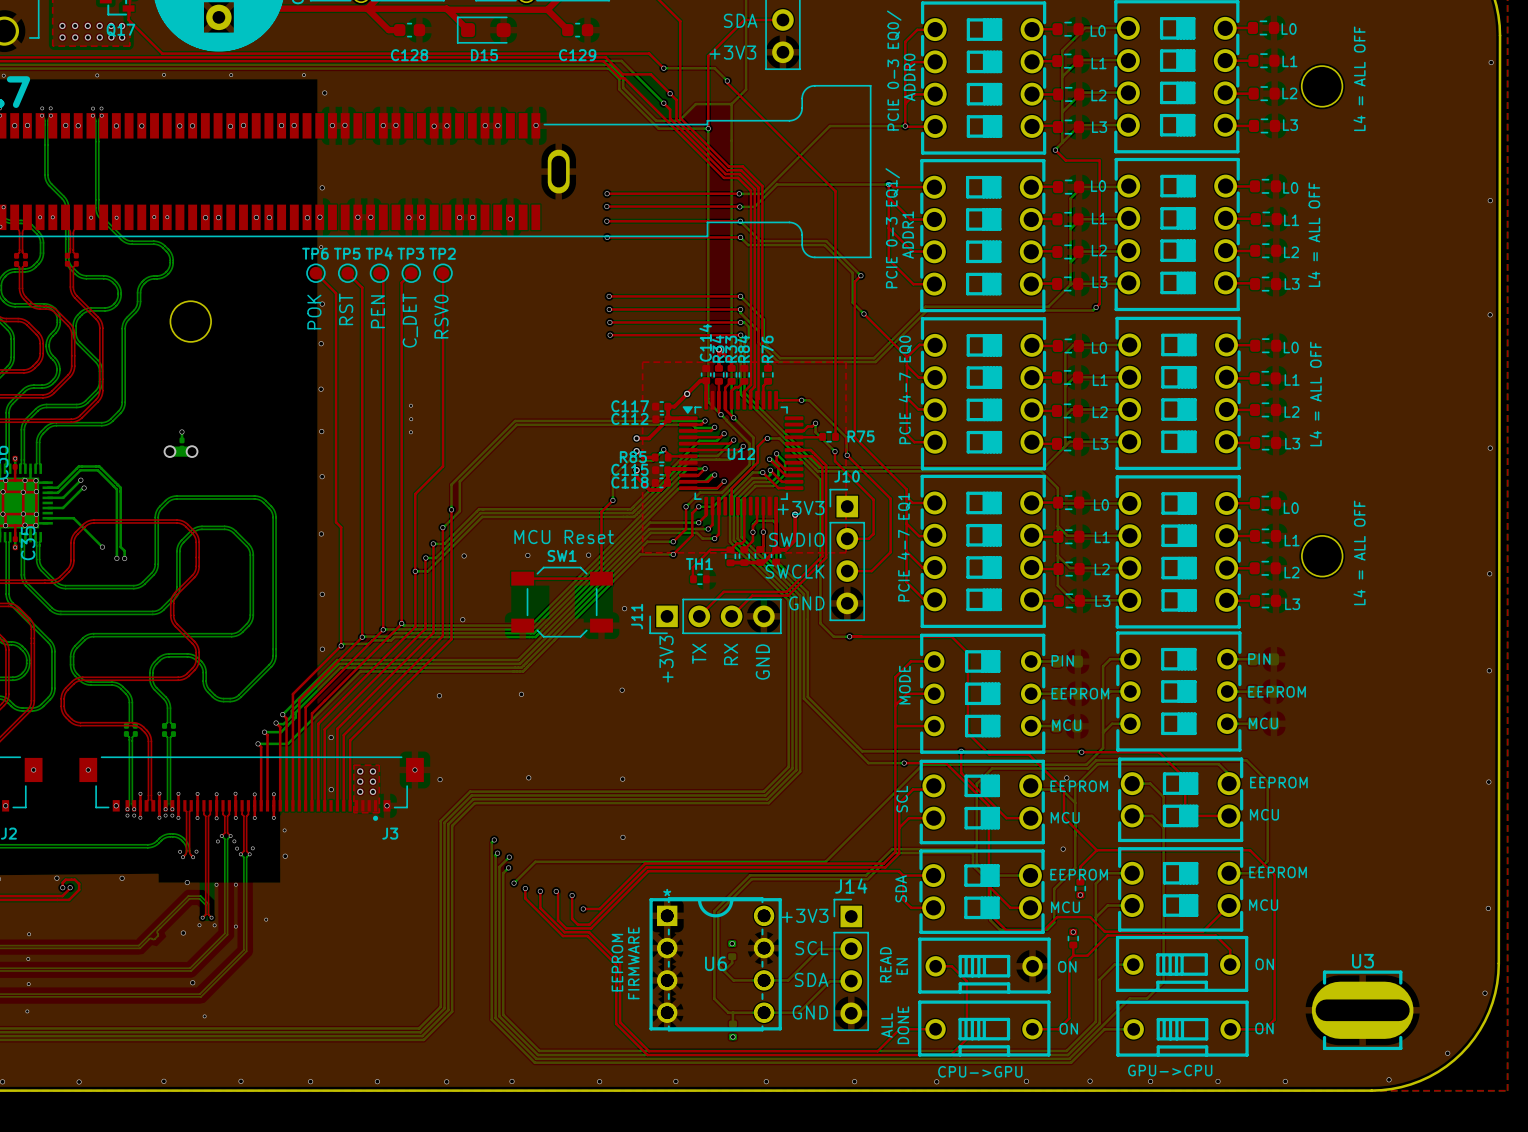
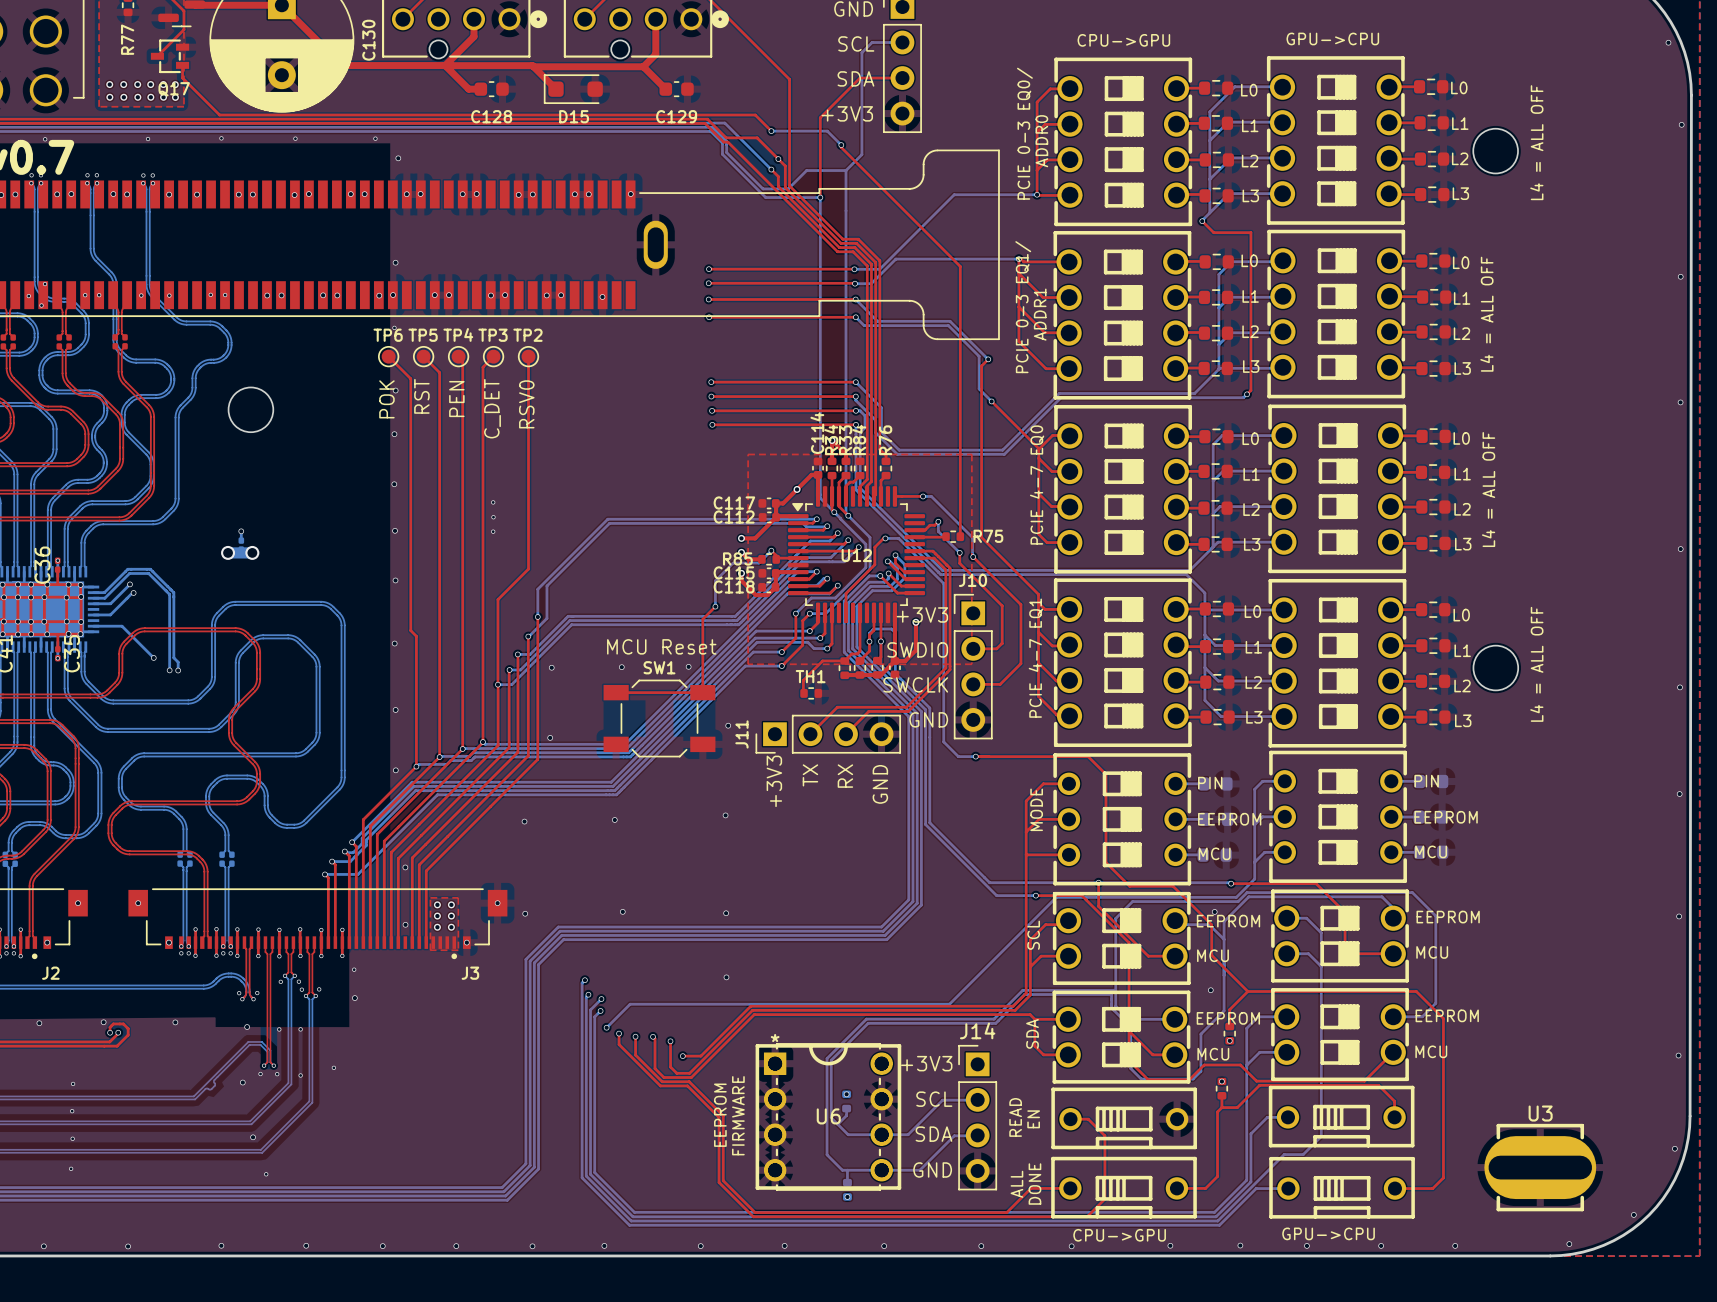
text: ON (1264, 964) -> none
text: ON (1067, 966) -> none
text: ON (1068, 1028) -> none
text: ON (1264, 1028) -> none

